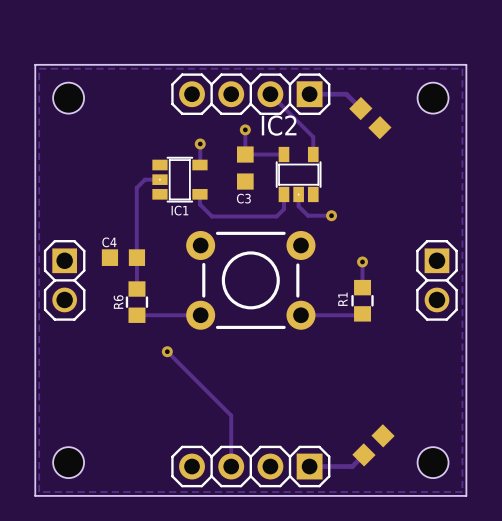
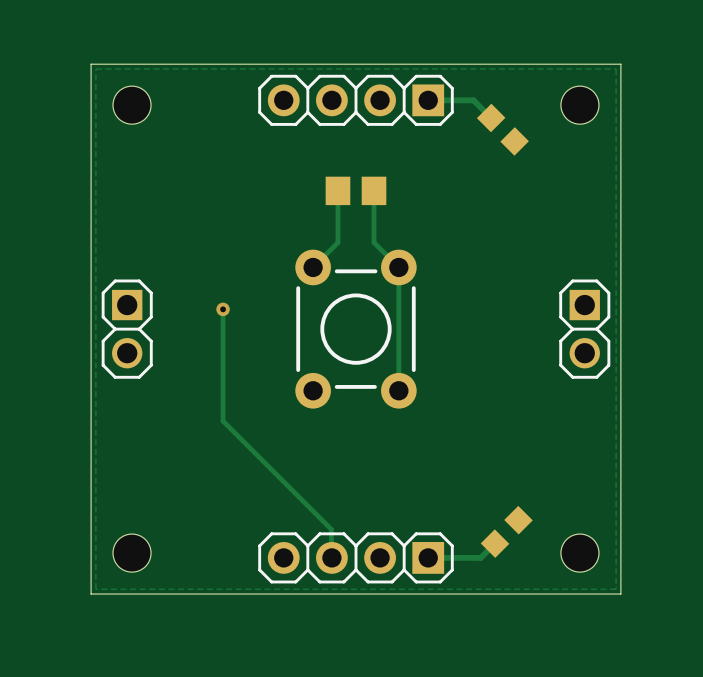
track: (270, 94) (313, 137) (313, 154) -> none
track: (245, 129) (245, 154) (283, 154) -> none
via: (245, 129) -> none
track: (200, 143) (199, 164) -> none
via: (200, 143) -> none
track: none -> (337, 190) (337, 242) (313, 267)
part: none -> (355, 190)
track: none -> (374, 190) (374, 242) (398, 267) (398, 390)
C3: (245, 168) -> none
IC2: (298, 174) -> none
track: (159, 179) (145, 179) (136, 187) (136, 257) -> none
IC1: (179, 179) -> none
track: (199, 194) (199, 204) (212, 216) (276, 216) (283, 209) (283, 194) -> none
track: (298, 194) (298, 206) (308, 215) (331, 215) -> none
via: (331, 215) -> none
C4: (123, 257) -> none
track: (136, 257) (136, 288) -> none
track: (362, 261) (362, 287) -> none
via: (362, 261) -> none
via: none -> (223, 309)
part rotation: 0° (250, 280) -> 90° clockwise (355, 329)
R1: (362, 300) -> none
R6: (136, 302) -> none
track: (362, 313) (300, 315) -> none
track: (136, 315) (200, 315) -> none
track: (167, 351) (231, 415) (231, 466) -> (223, 309) (223, 421) (331, 529) (331, 557)
via: (167, 351) -> none

